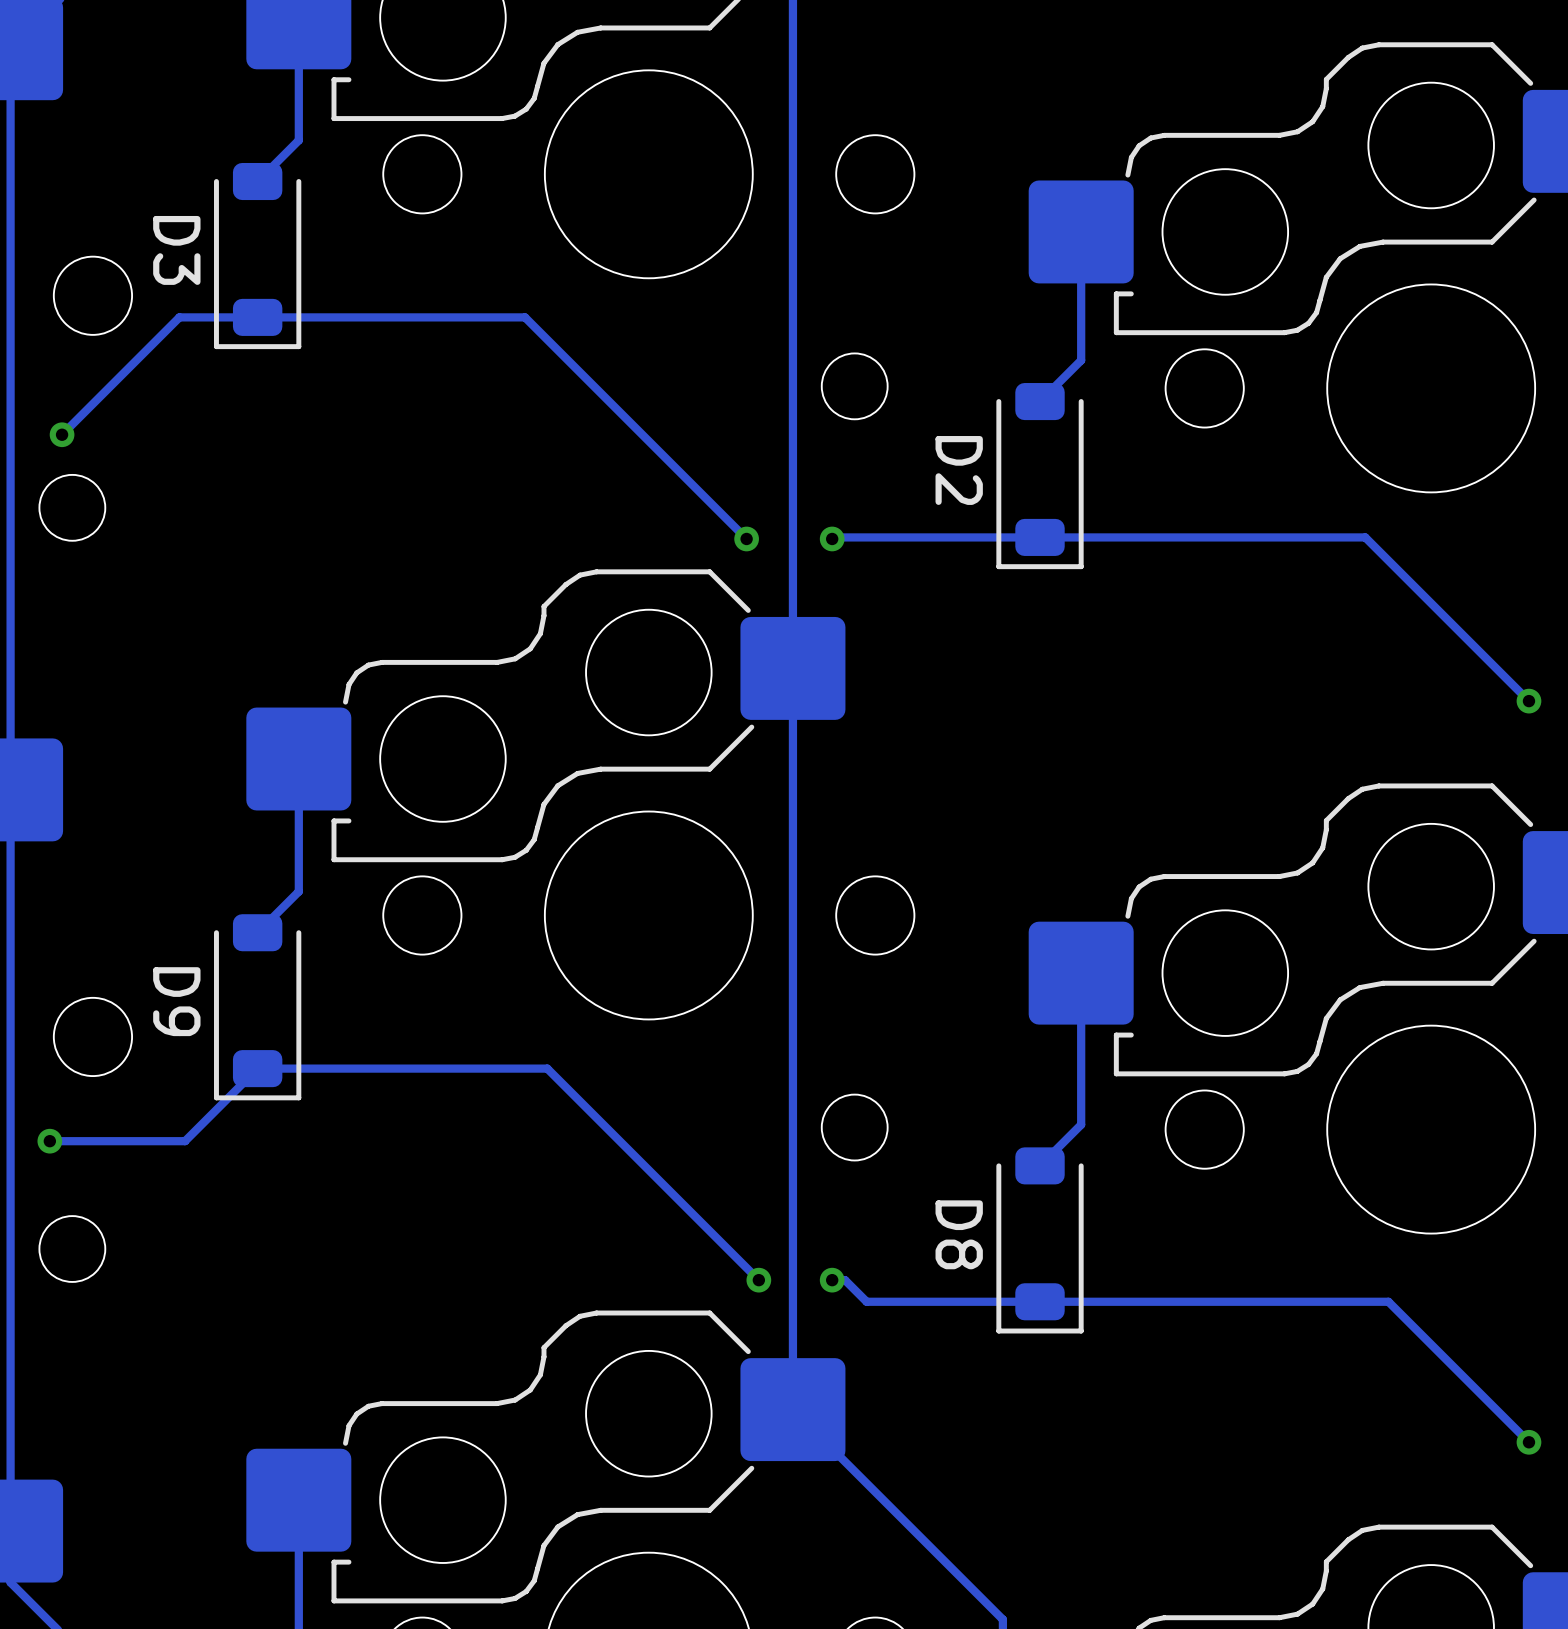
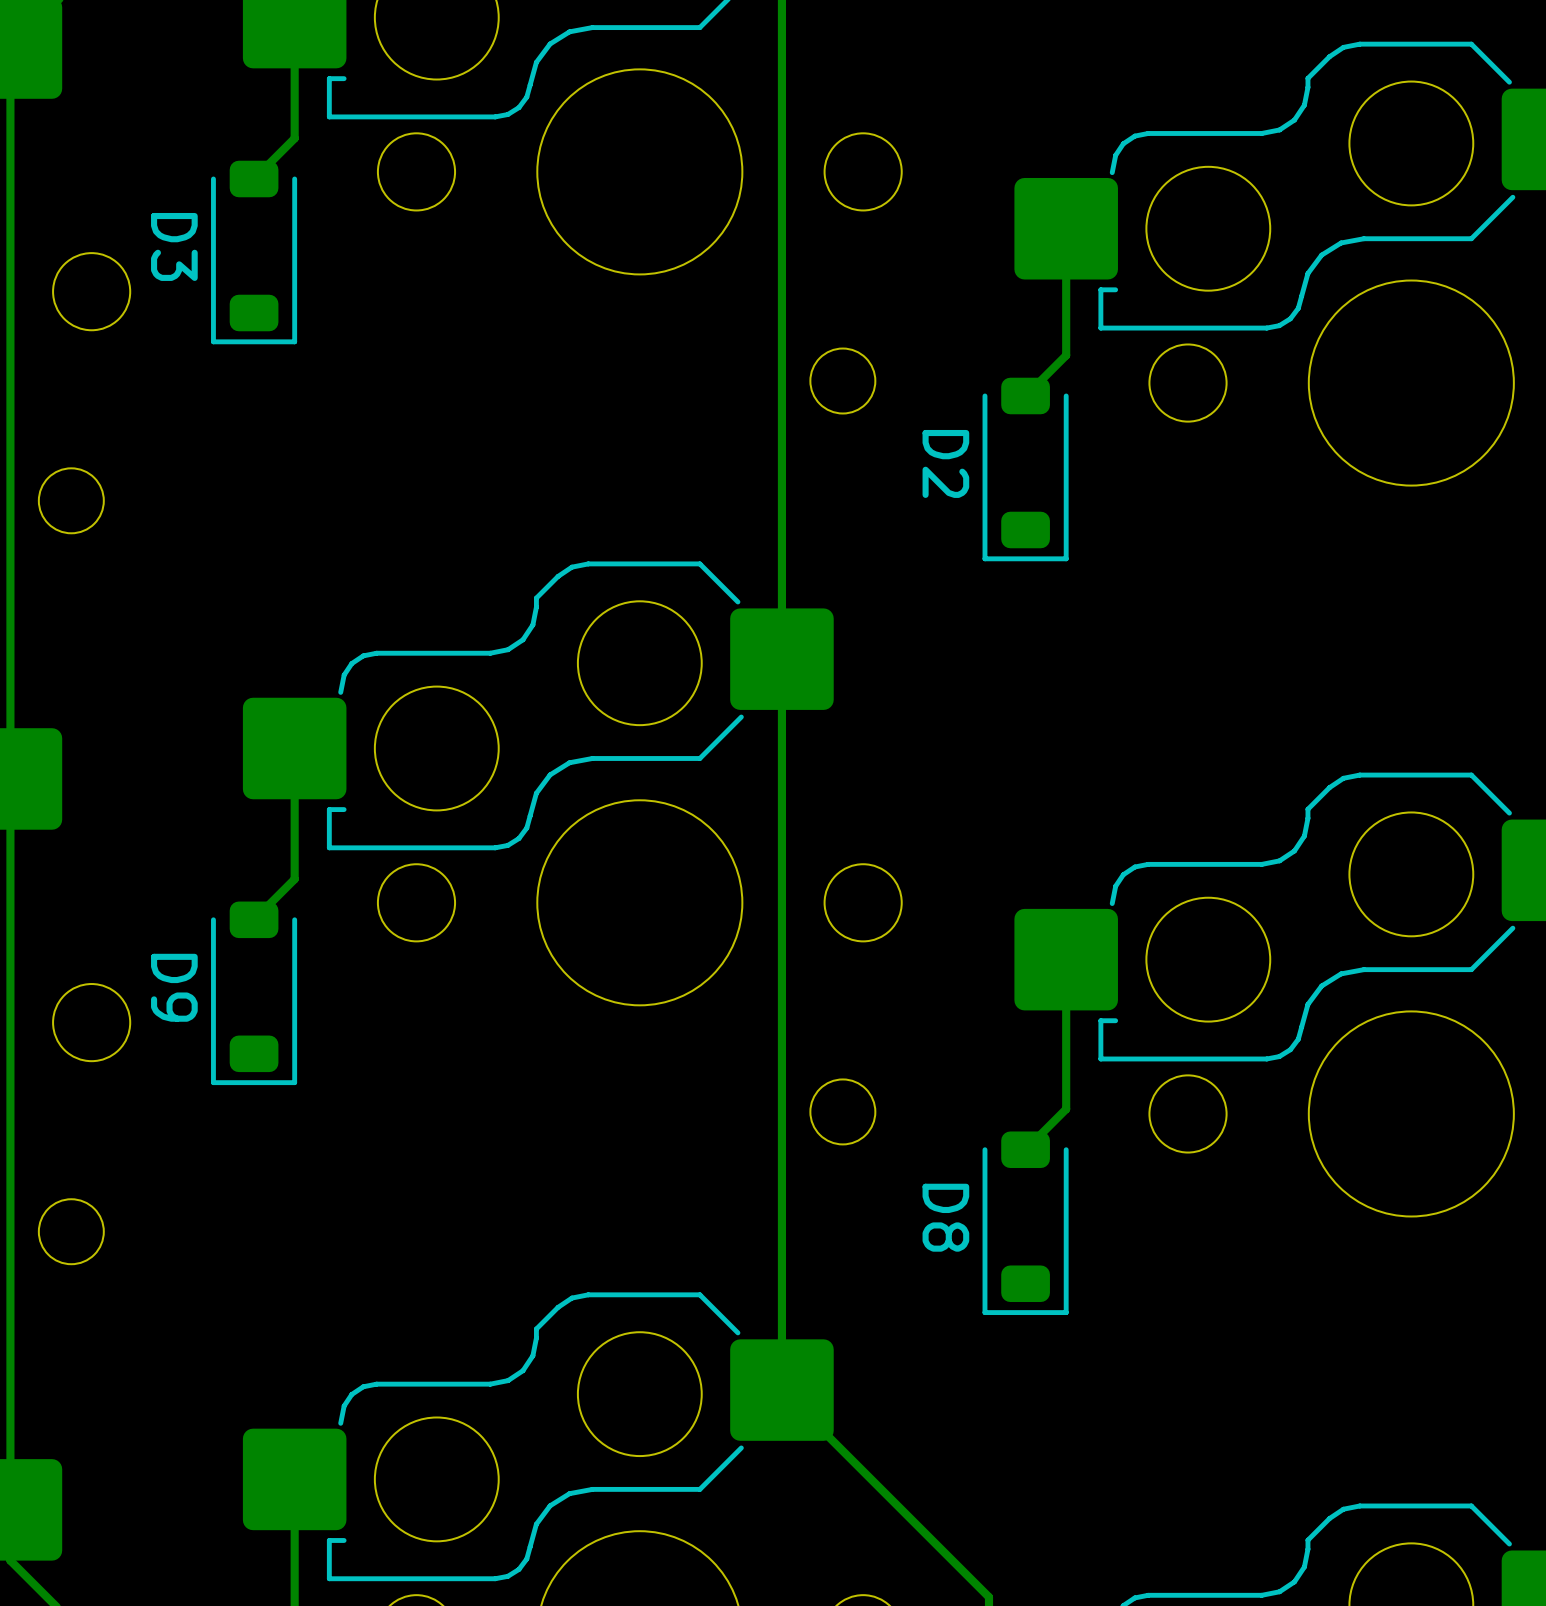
track: (62, 434) (179, 317) (525, 317) (746, 538) -> none
via: (62, 434) -> none
via: (746, 538) -> none
track: (832, 538) (833, 537) (1365, 537) (1528, 701) -> none
via: (832, 538) -> none
via: (1528, 701) -> none
track: (49, 1141) (185, 1141) (257, 1068) (547, 1068) (758, 1280) -> none
via: (49, 1141) -> none
via: (758, 1280) -> none
track: (832, 1280) (845, 1280) (866, 1301) (1388, 1301) (1528, 1442) -> none
via: (832, 1280) -> none
via: (1528, 1442) -> none

